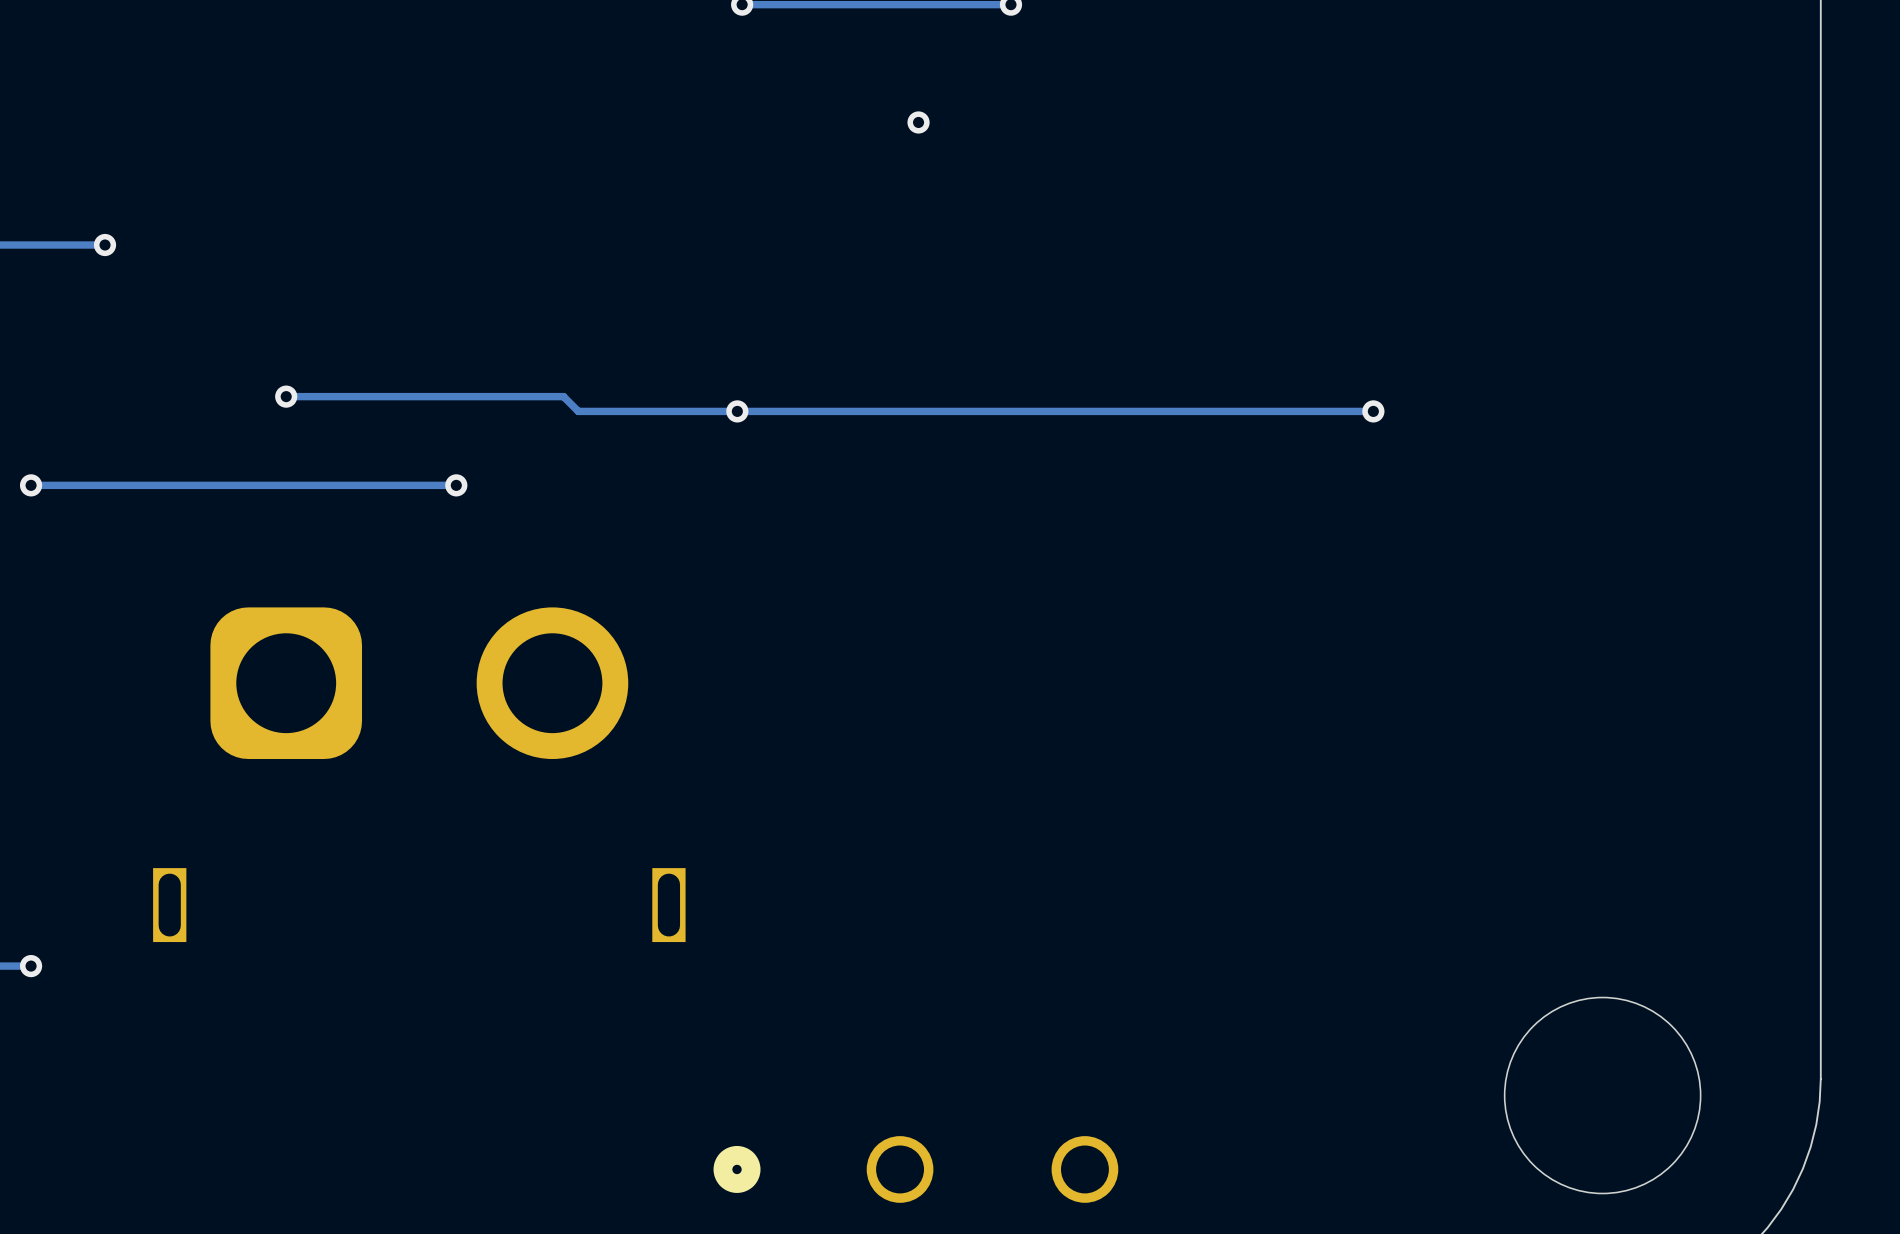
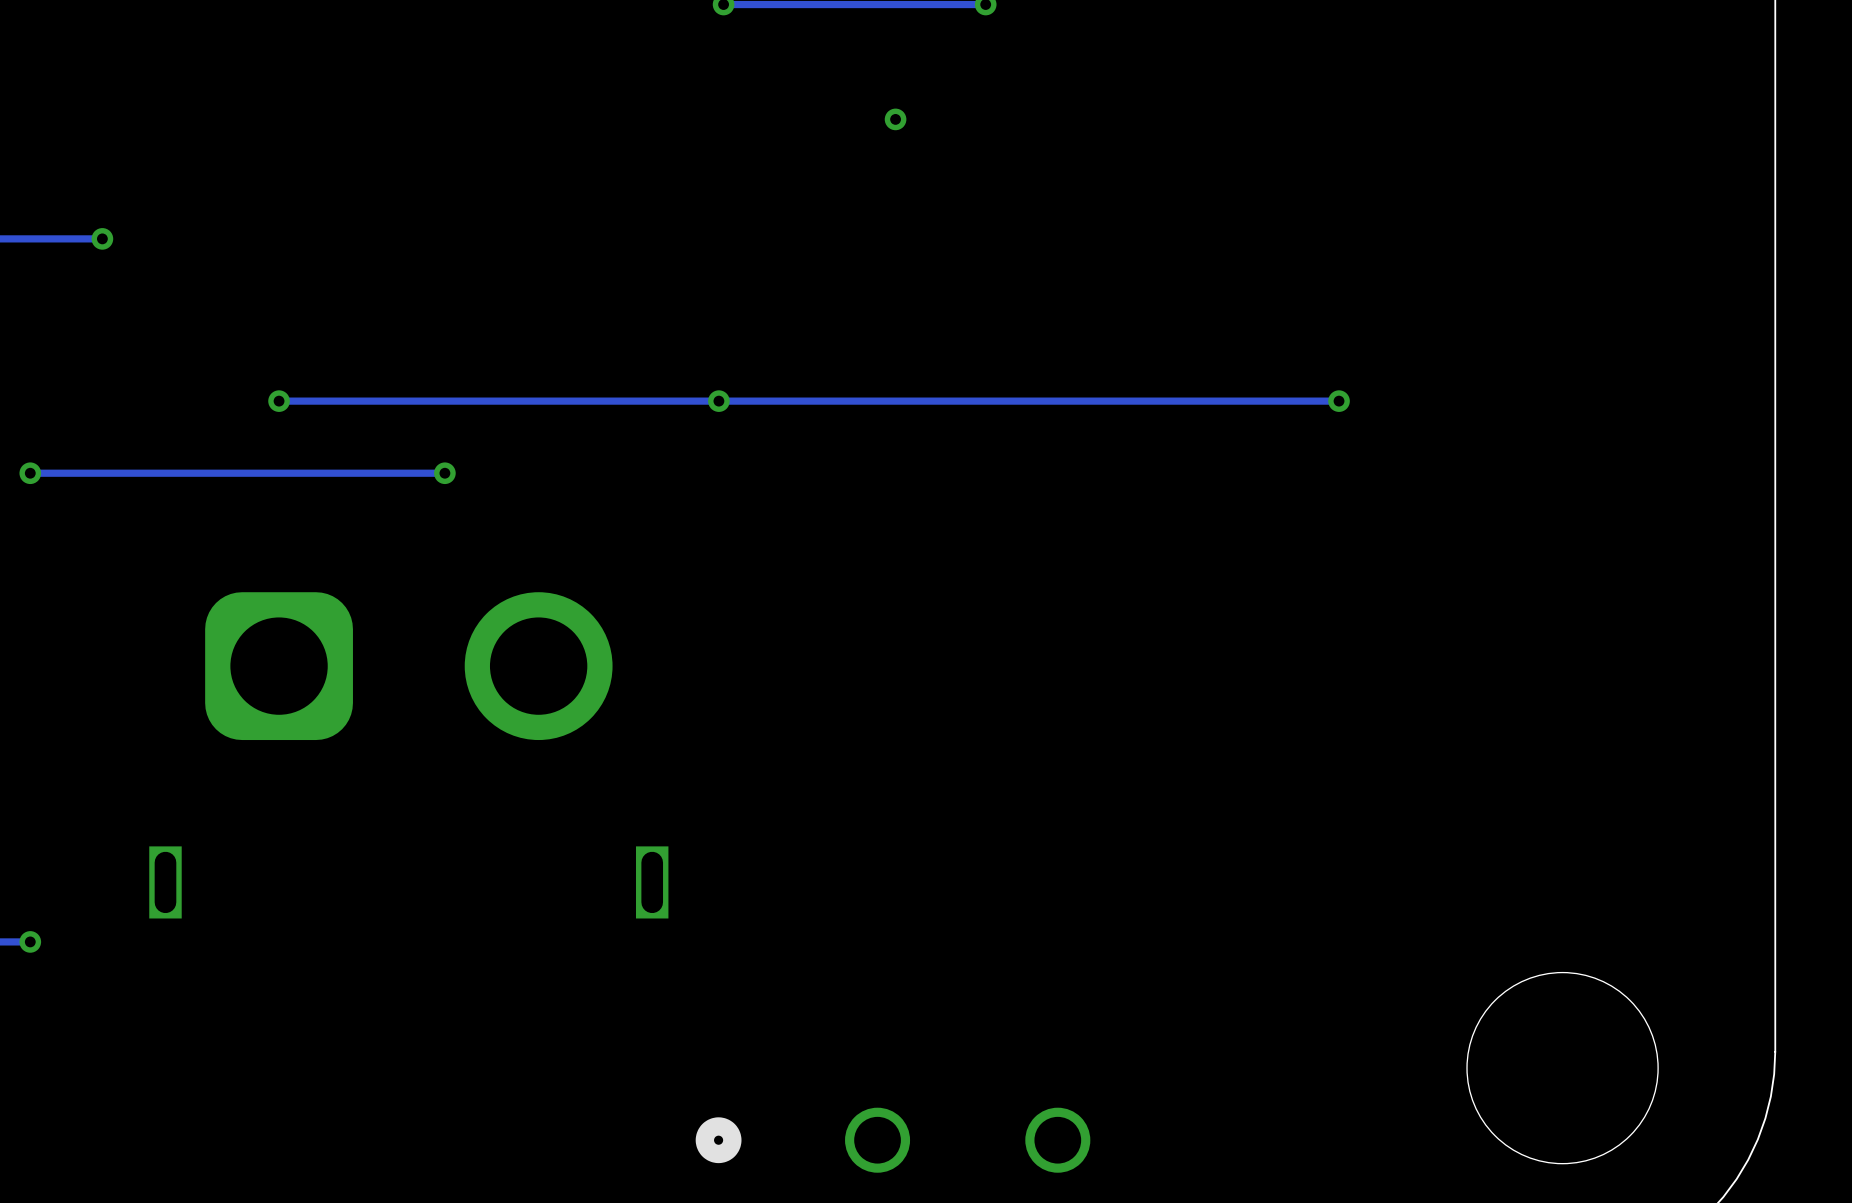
track: (286, 396) (563, 396) (578, 411) -> (279, 401) (563, 401)
via position: (286, 396) -> (279, 401)

